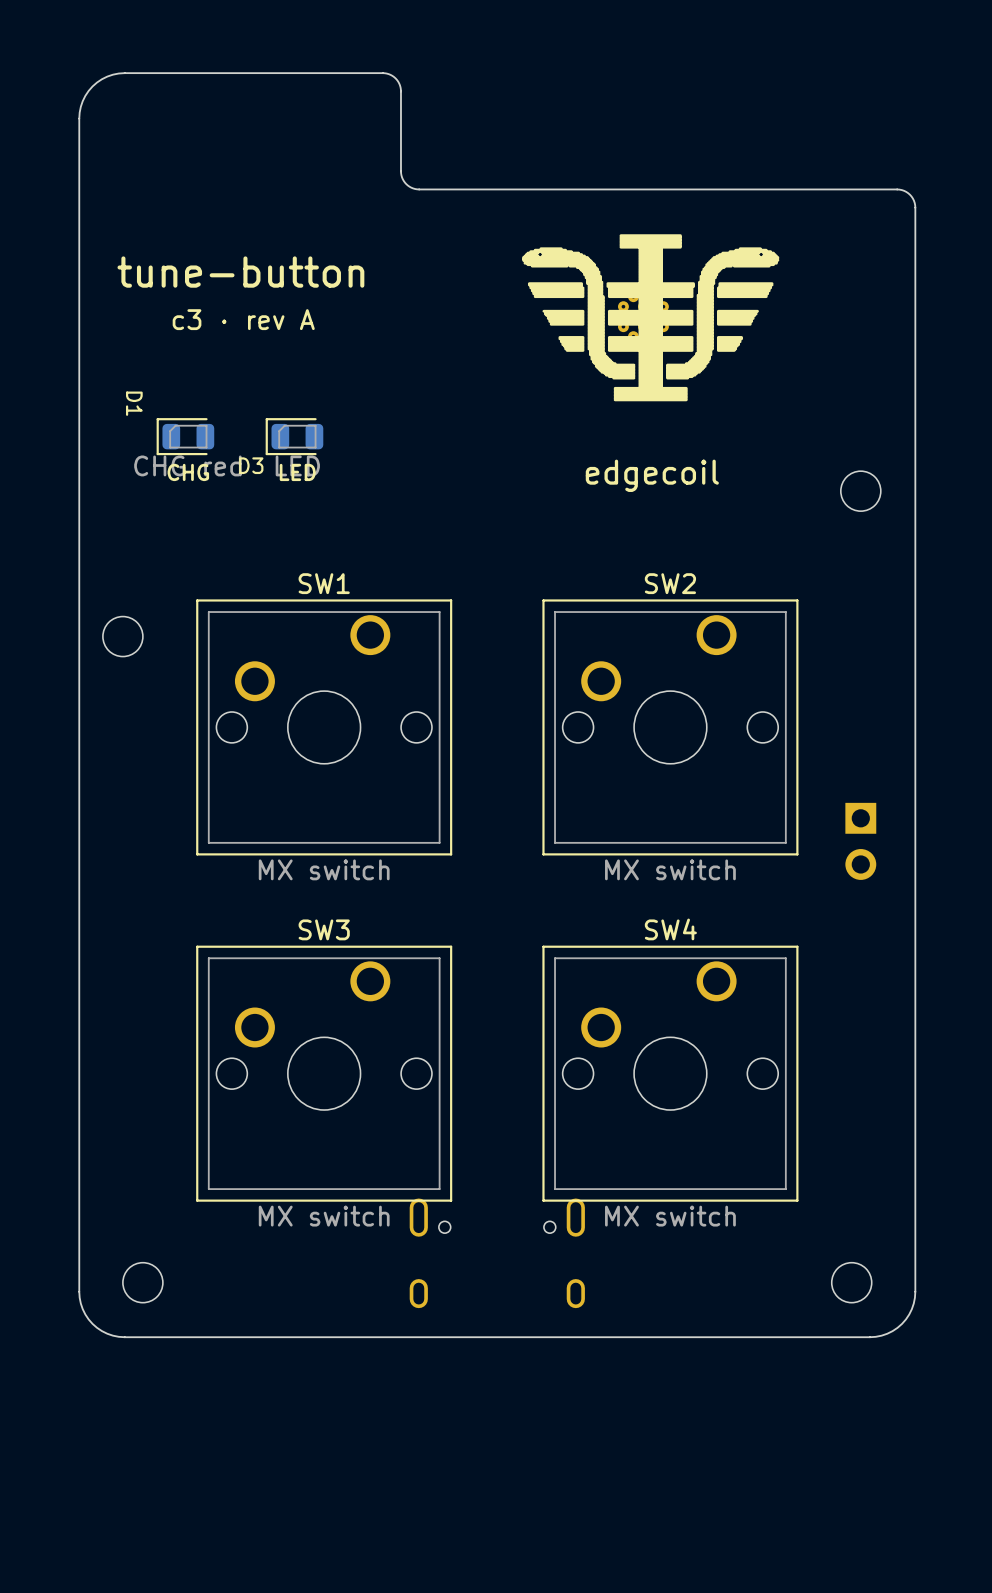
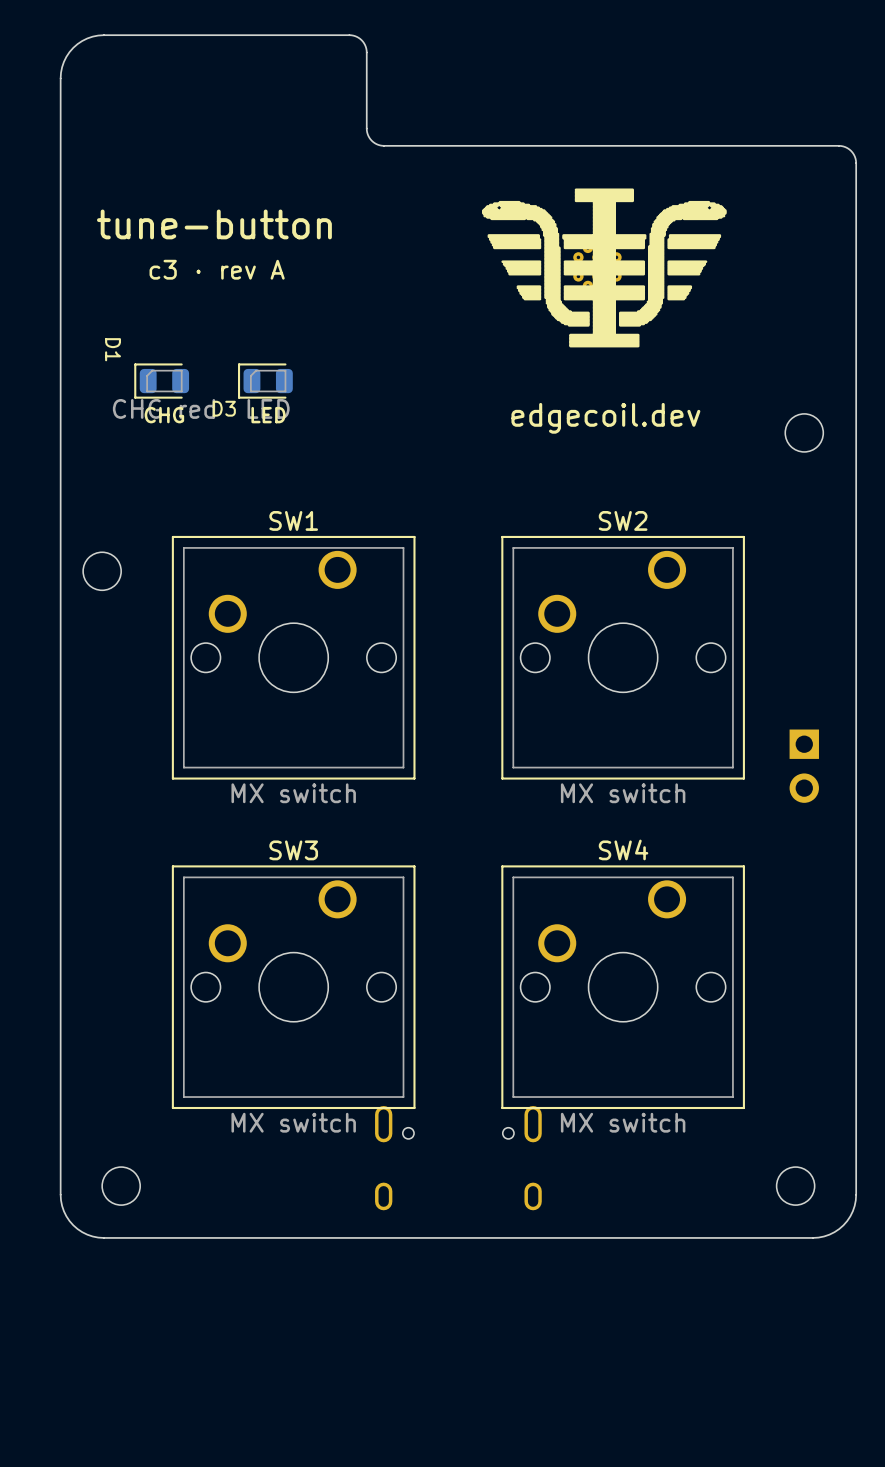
text: edgecoil (652, 475) -> edgecoil.dev (605, 418)

